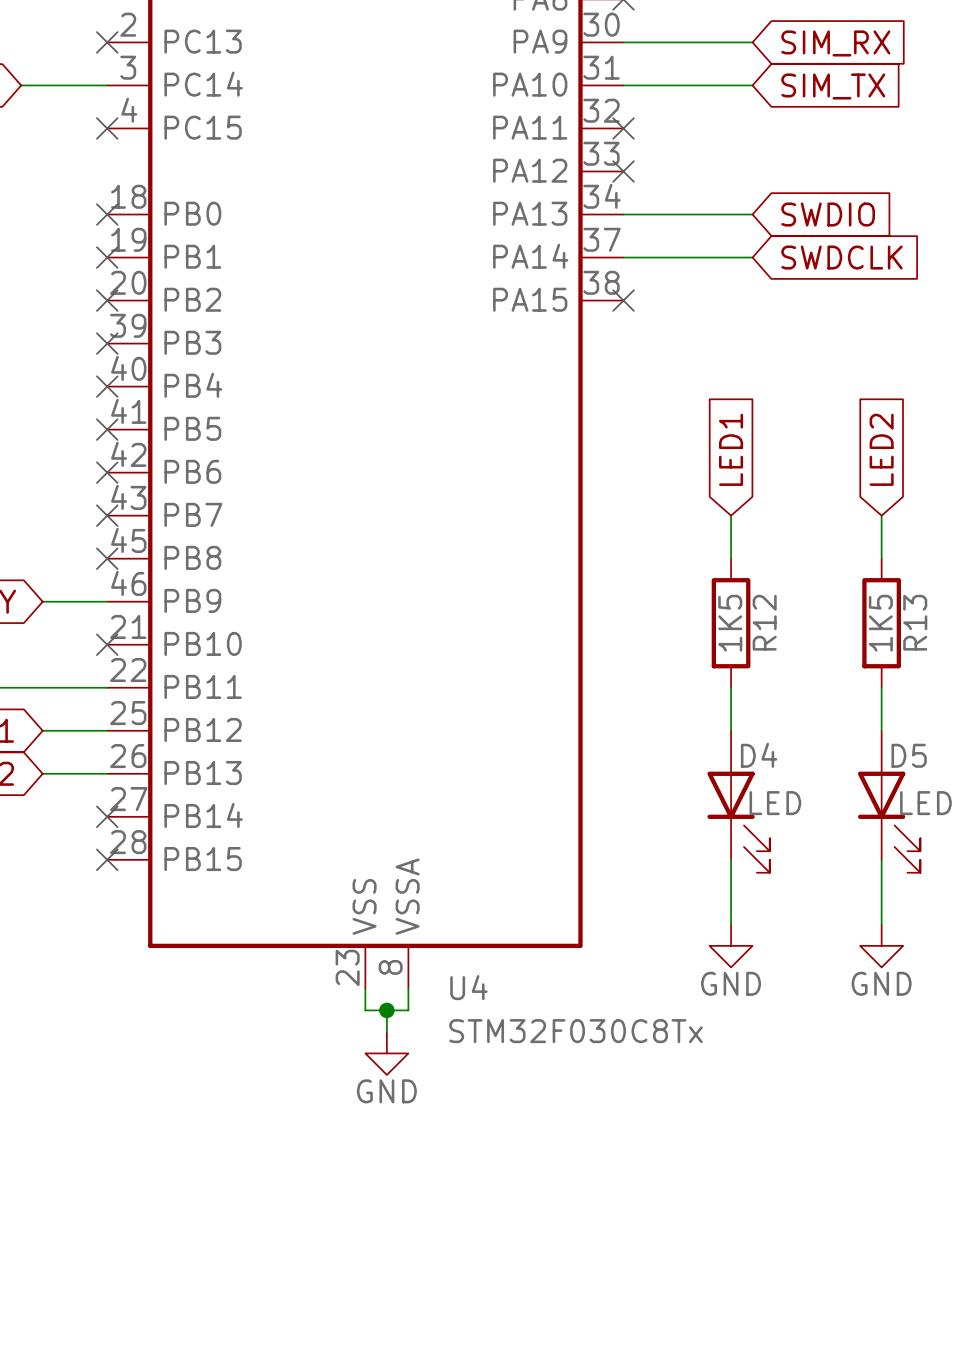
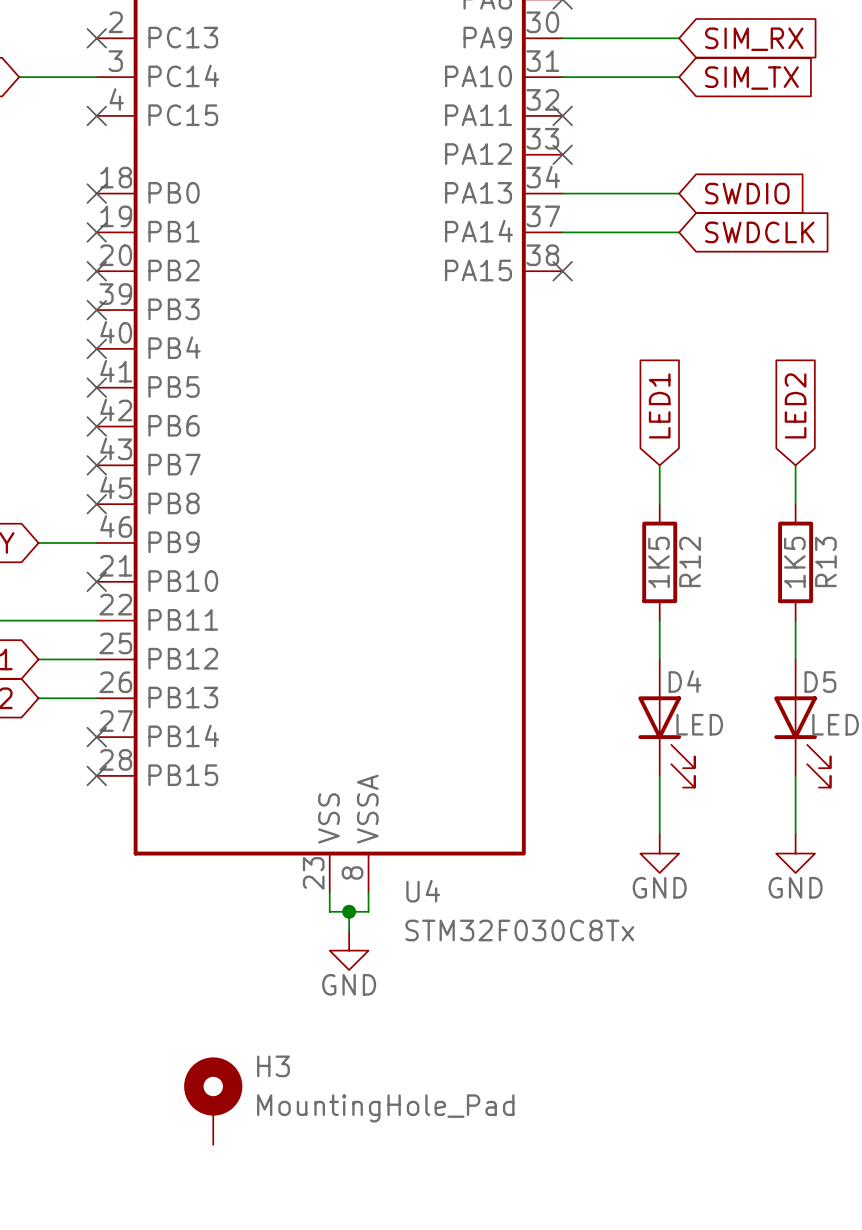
H3: none -> MountingHole_Pad (213, 1101)

